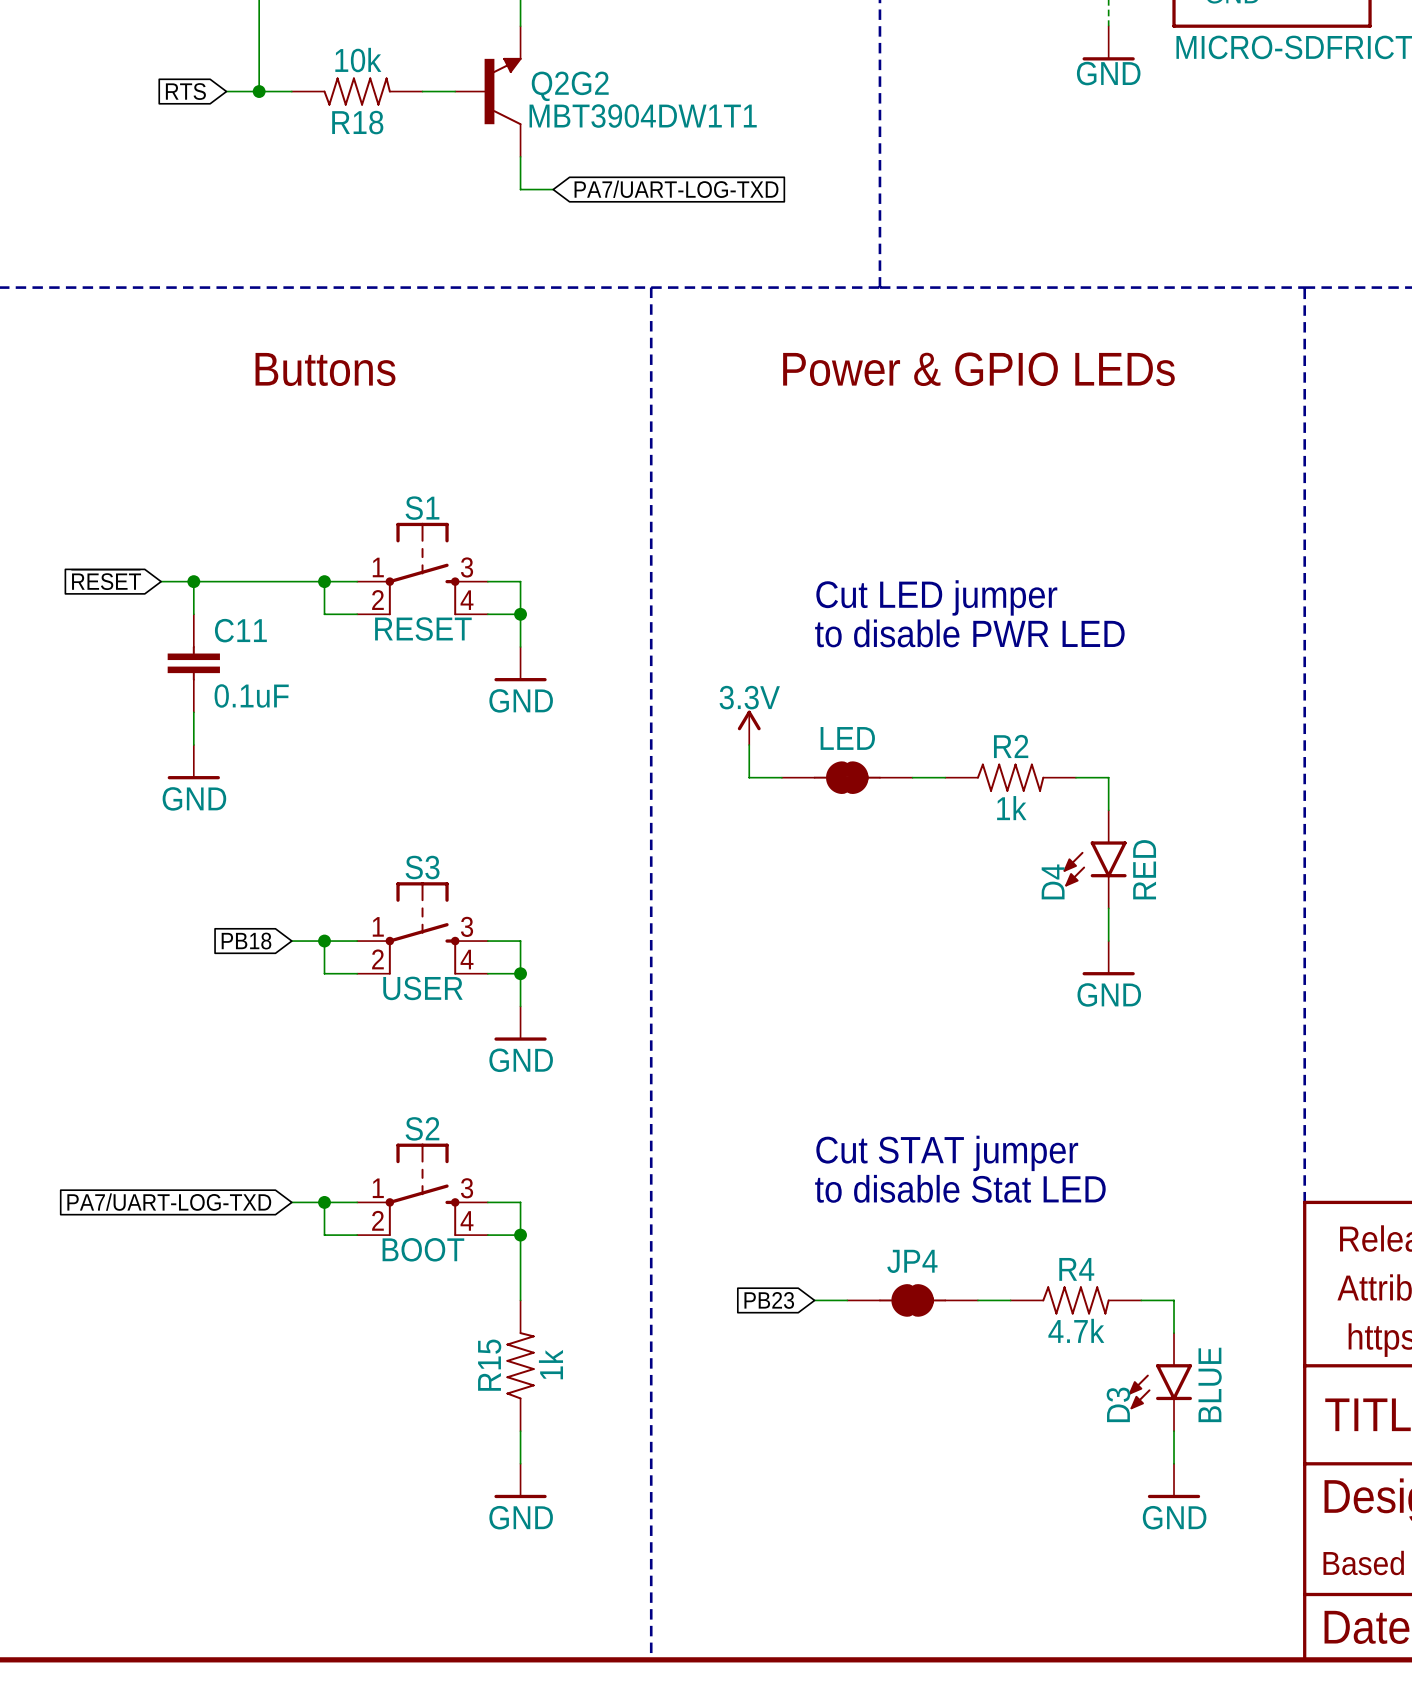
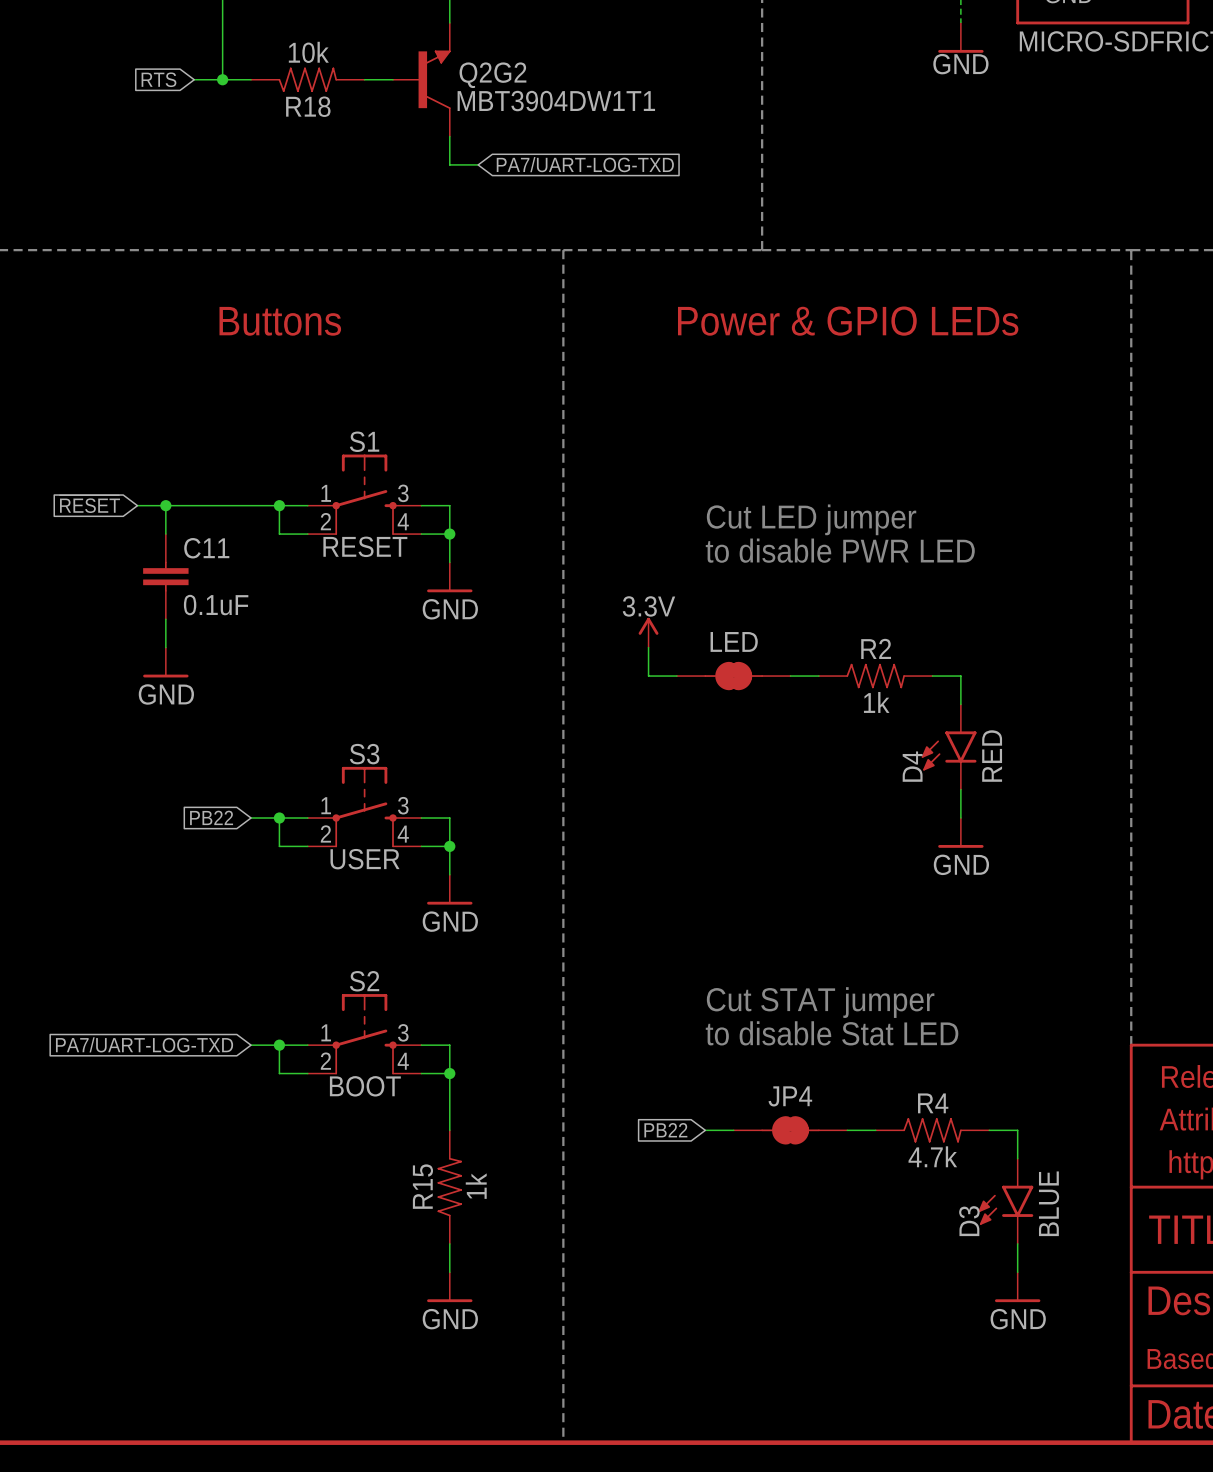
global label: PB18 (246, 941) -> PB22 (211, 817)
global label: PB23 (769, 1300) -> PB22 (665, 1130)

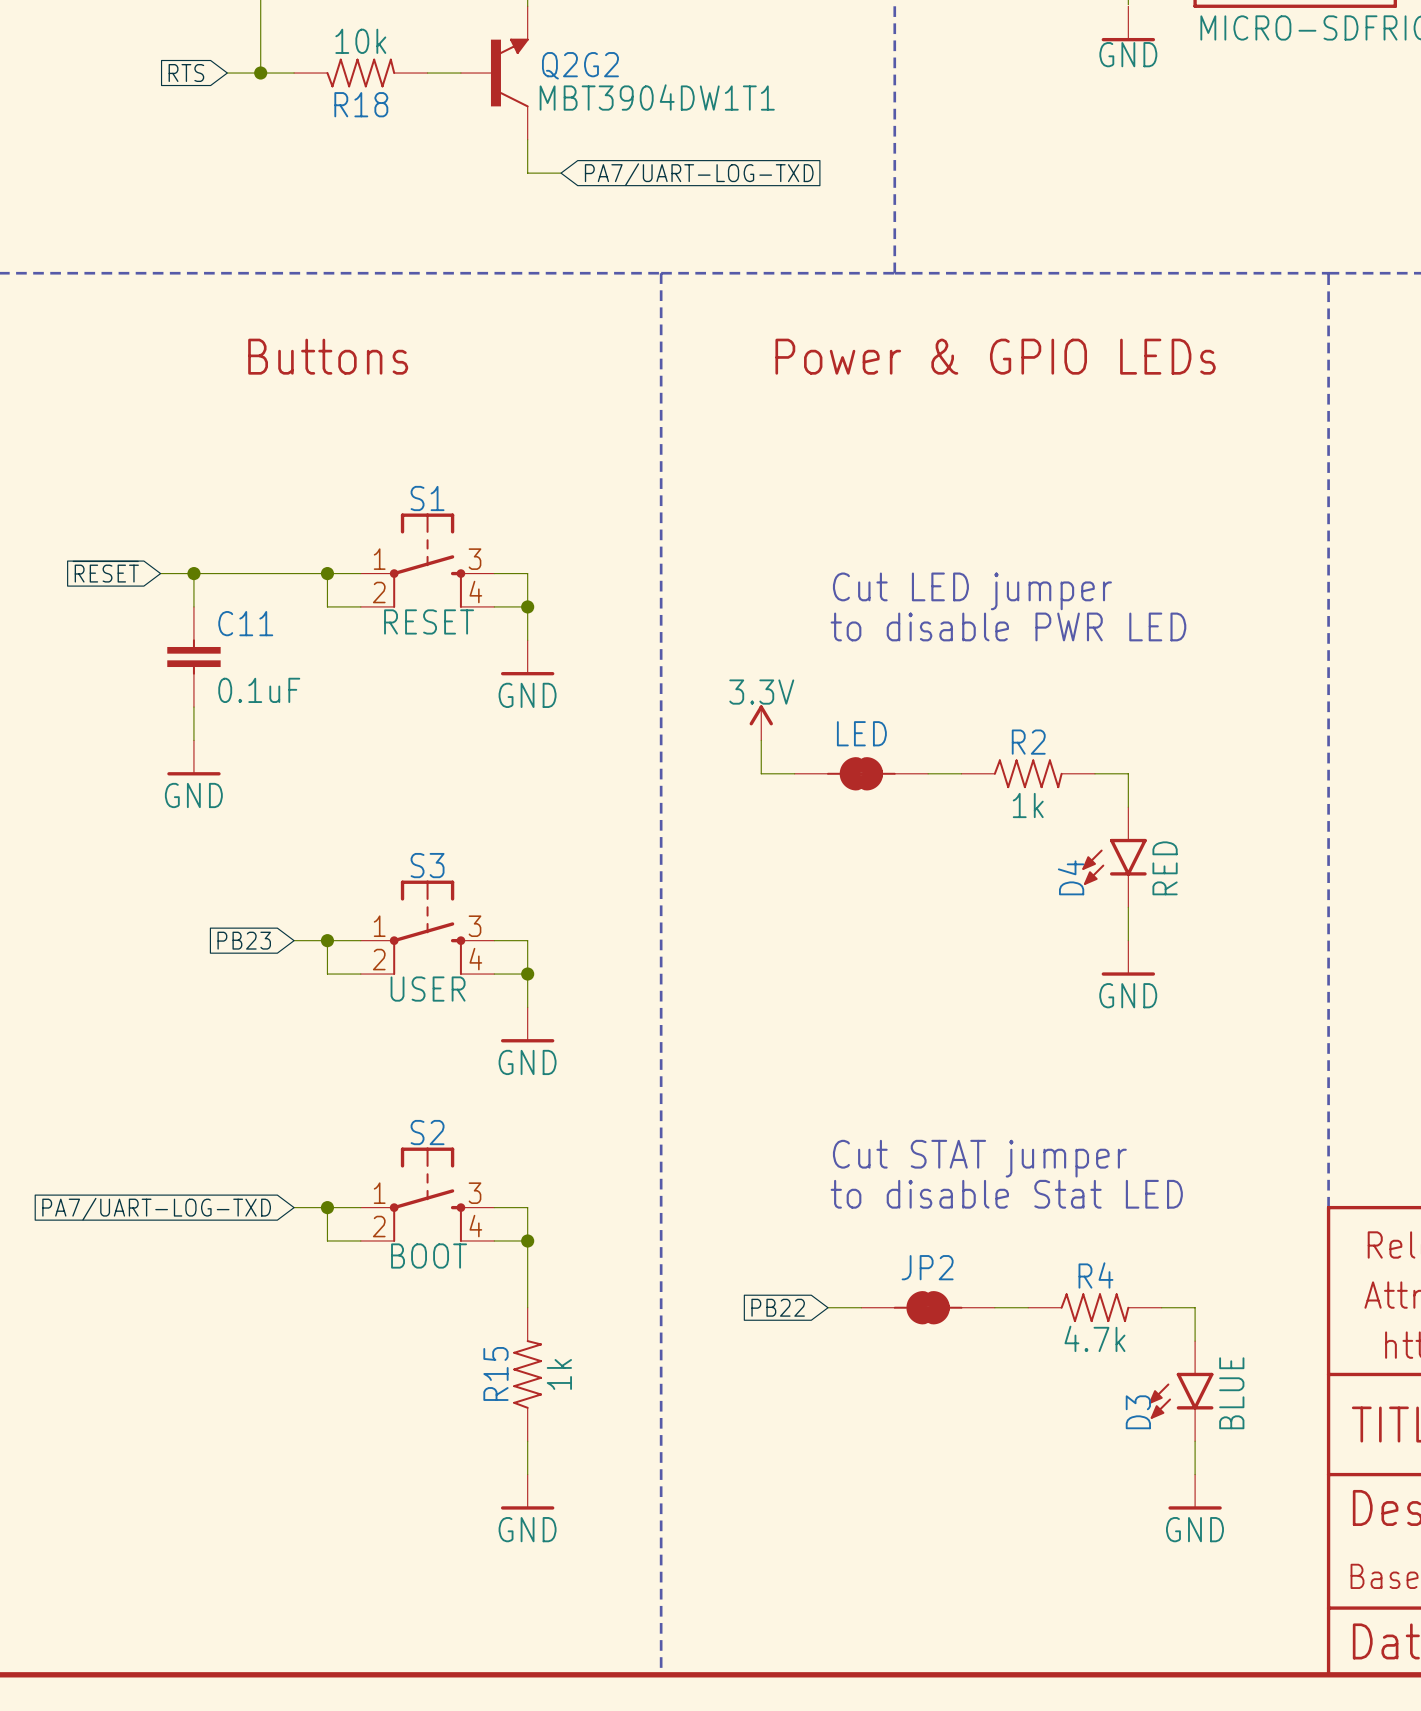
global label: PB22 (211, 817) -> PB23 (244, 940)
JP4 name: JP4 (790, 1096) -> JP2 (927, 1267)

